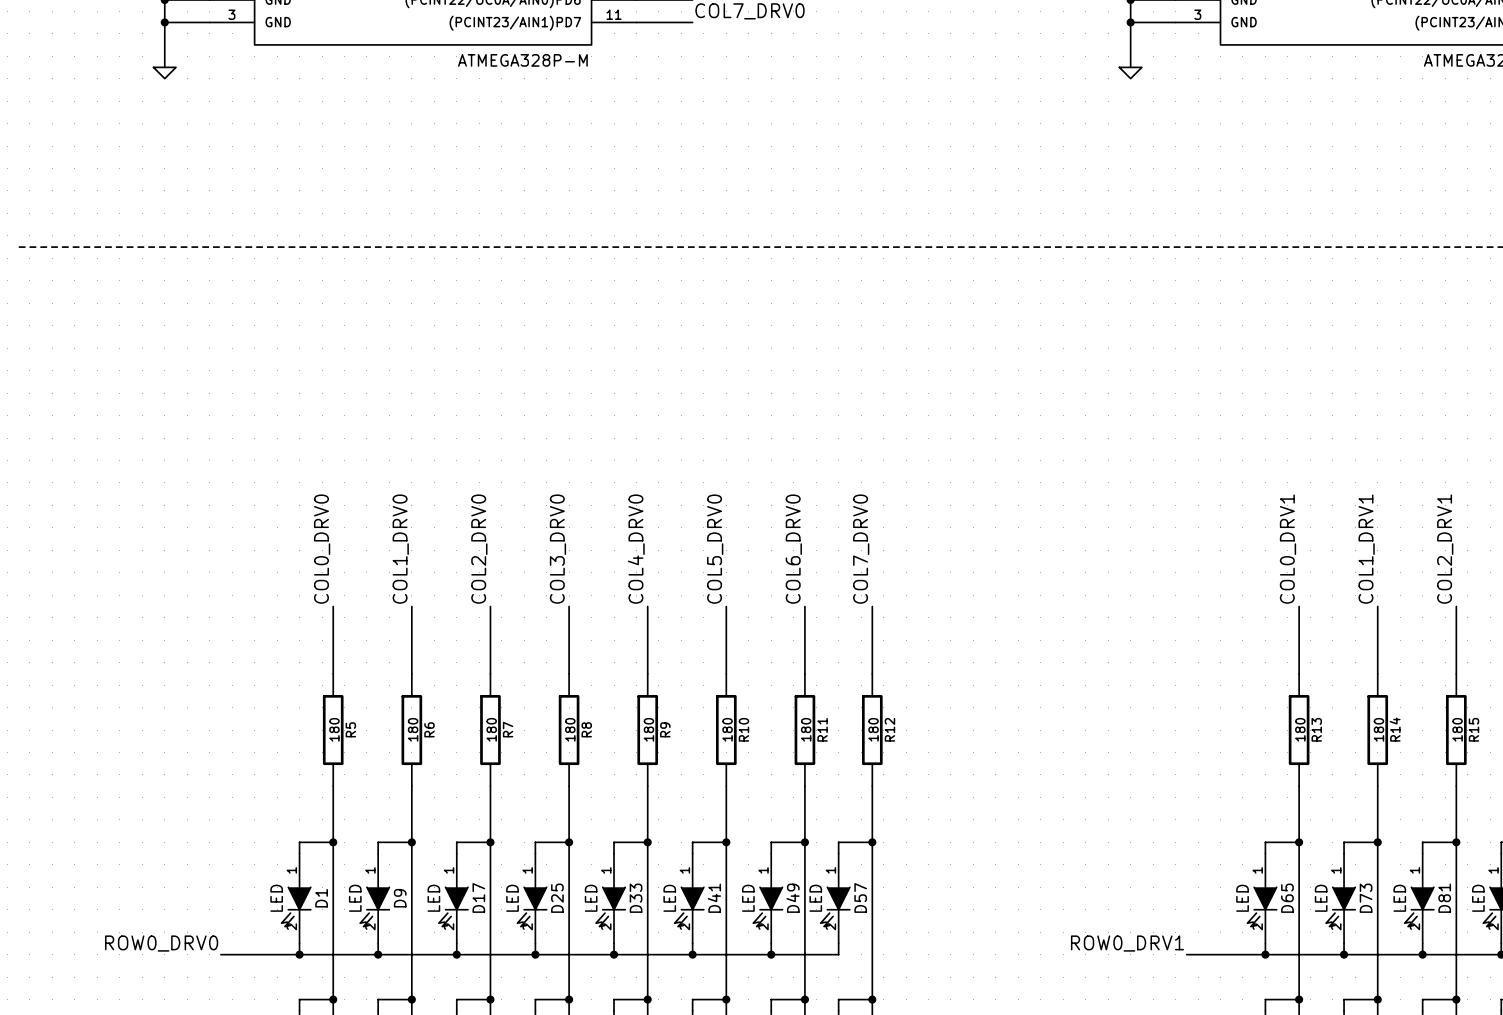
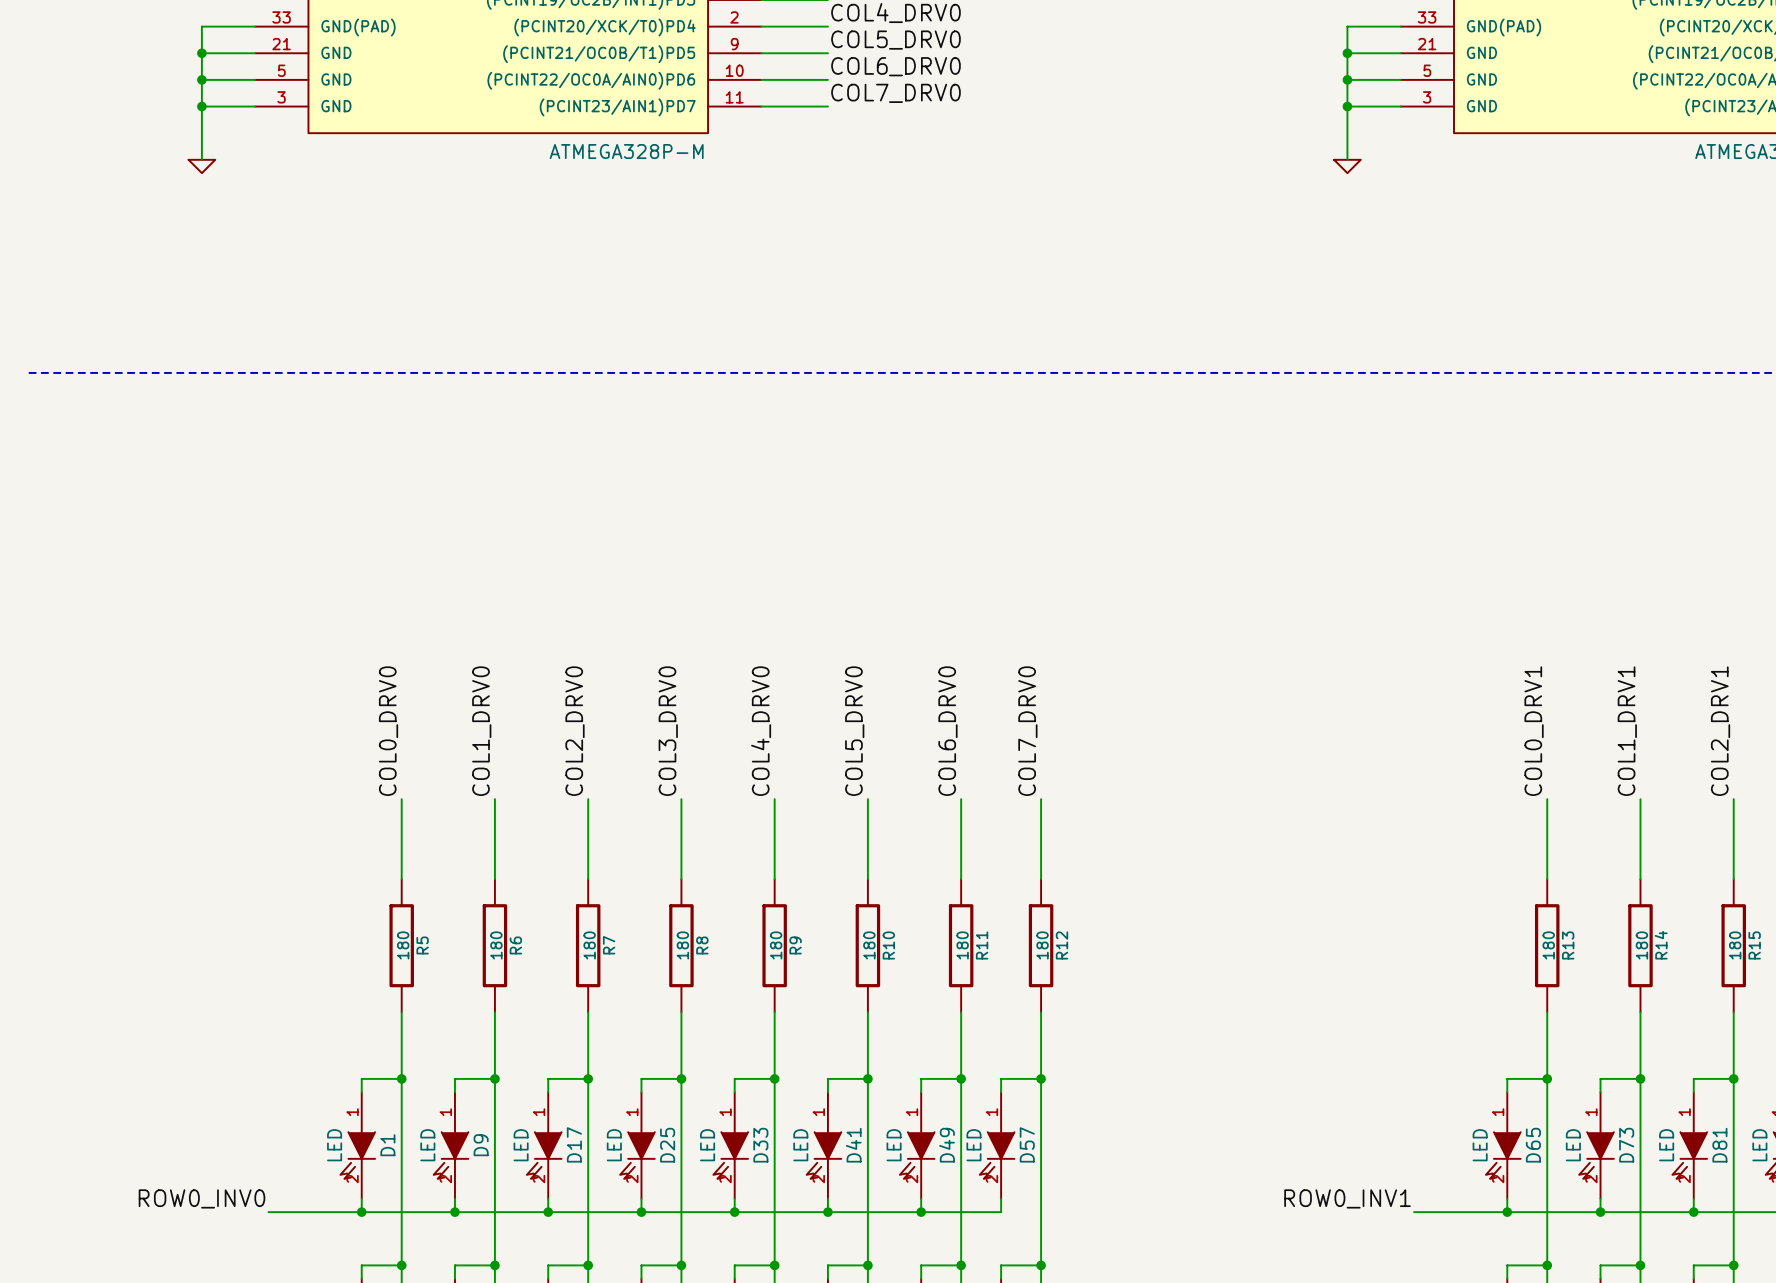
label: ROW0_DRV0 (161, 943) -> ROW0_INV0 (201, 1198)
label: ROW0_DRV1 (1127, 943) -> ROW0_INV1 (1347, 1198)

